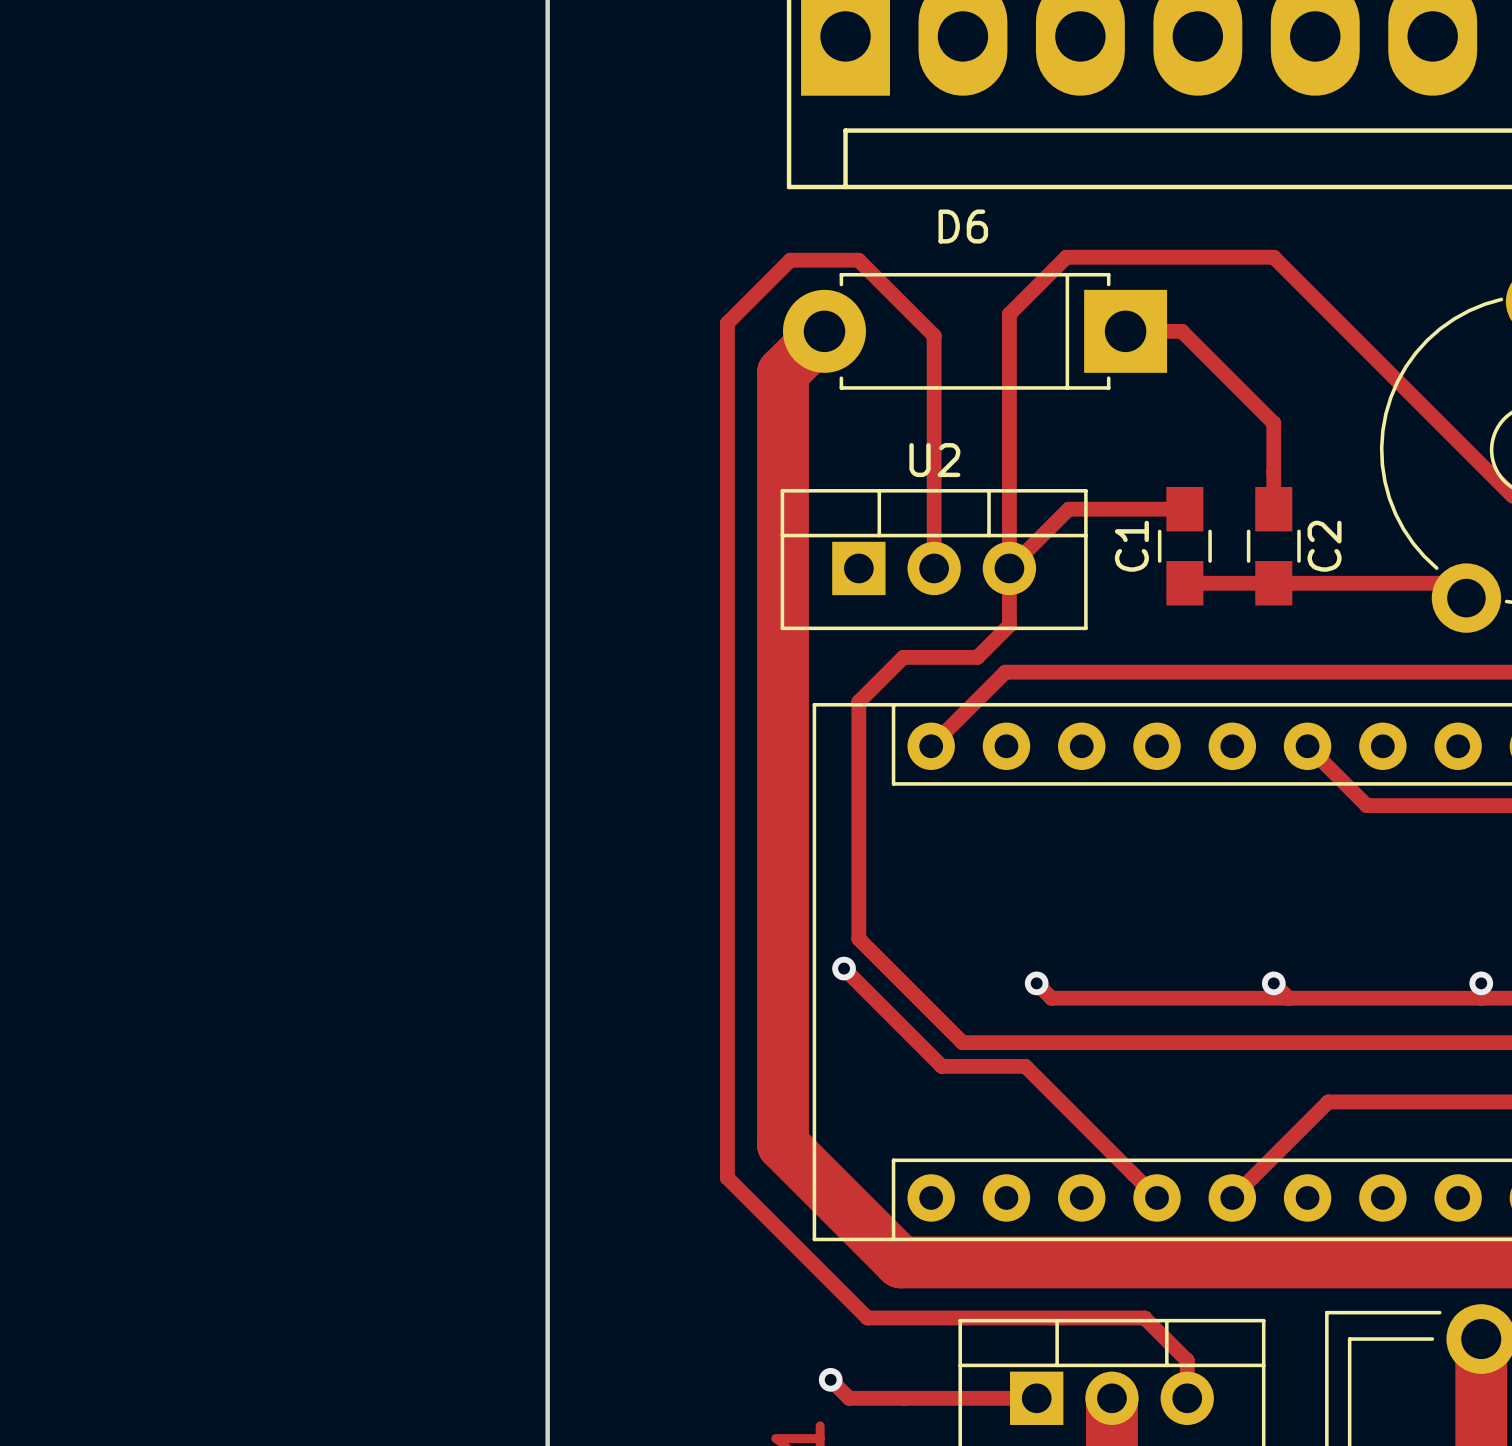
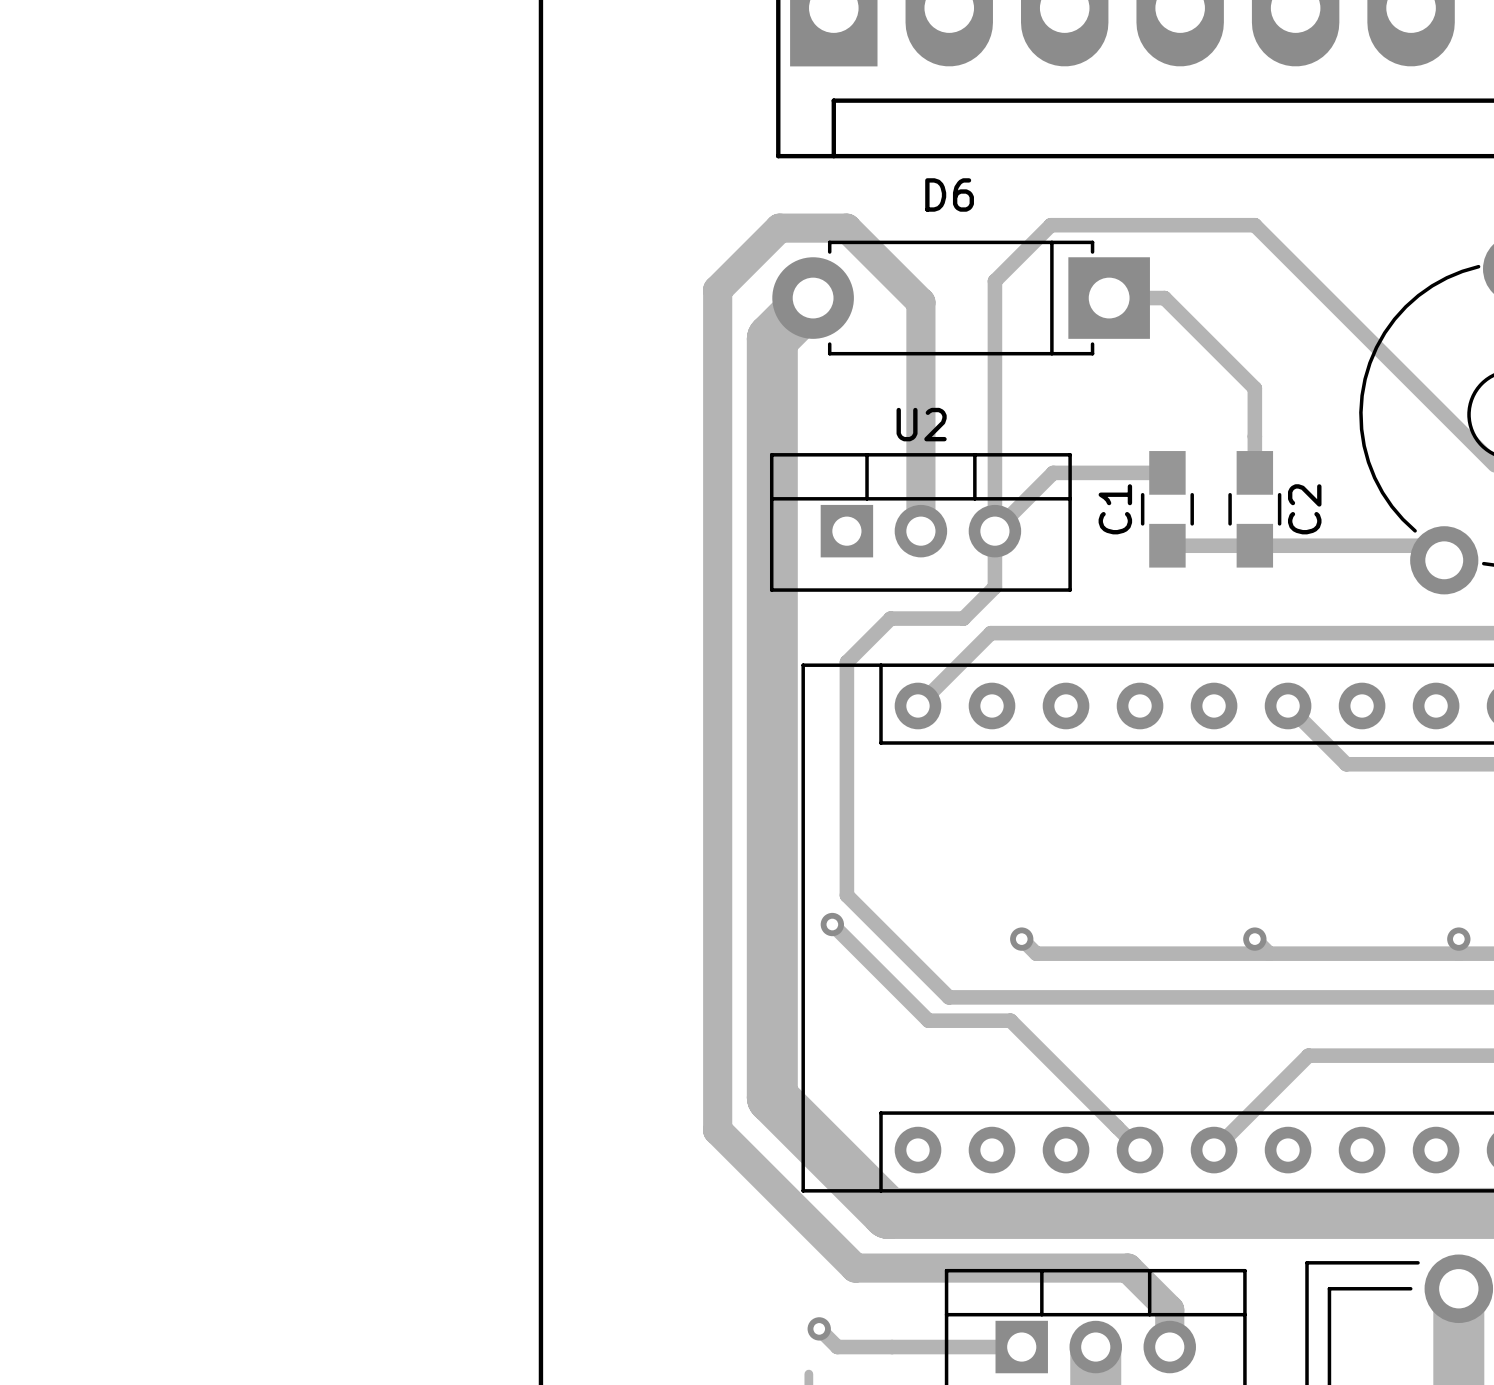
track width: thin (934, 568) (934, 335) (858, 260) (790, 260) (727, 323) (727, 1177) (867, 1317) (1144, 1317) (1187, 1360) (1187, 1398) -> thick (920, 531) (920, 302) (846, 228) (779, 228) (717, 289) (717, 1130) (855, 1268) (1127, 1268) (1169, 1309) (1169, 1347)

